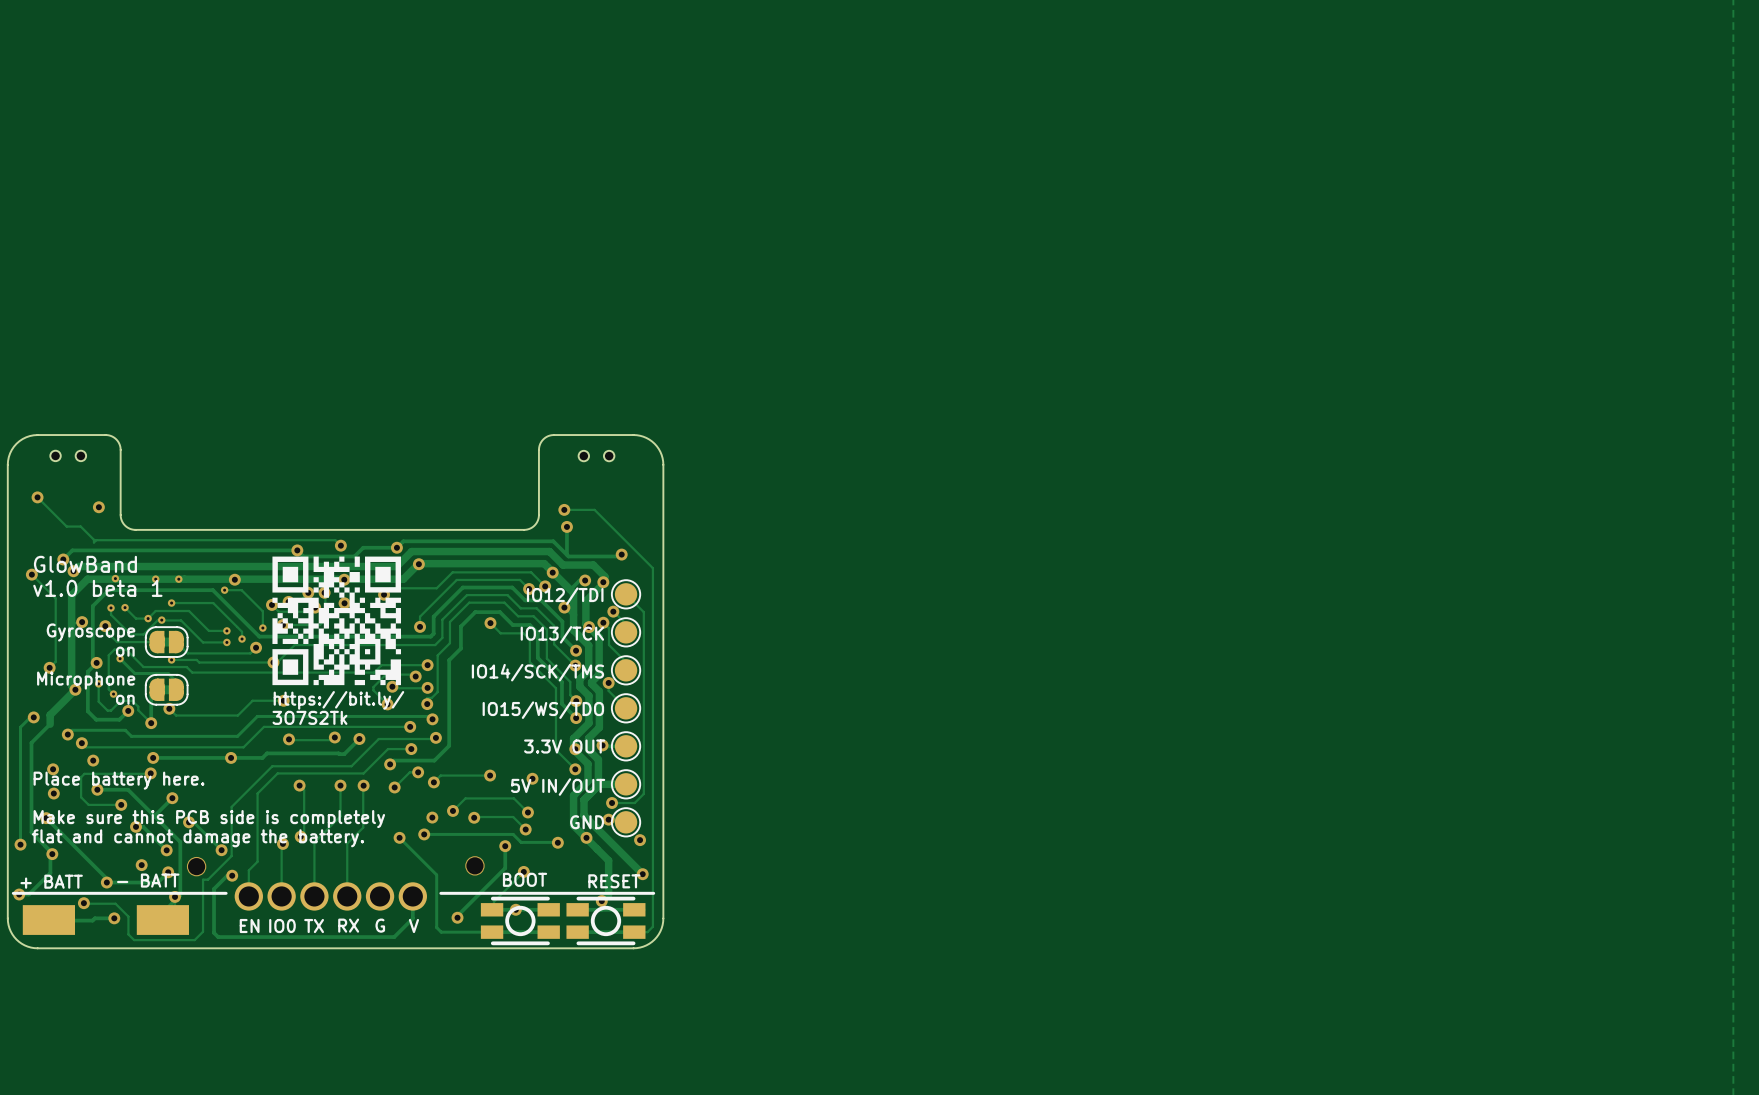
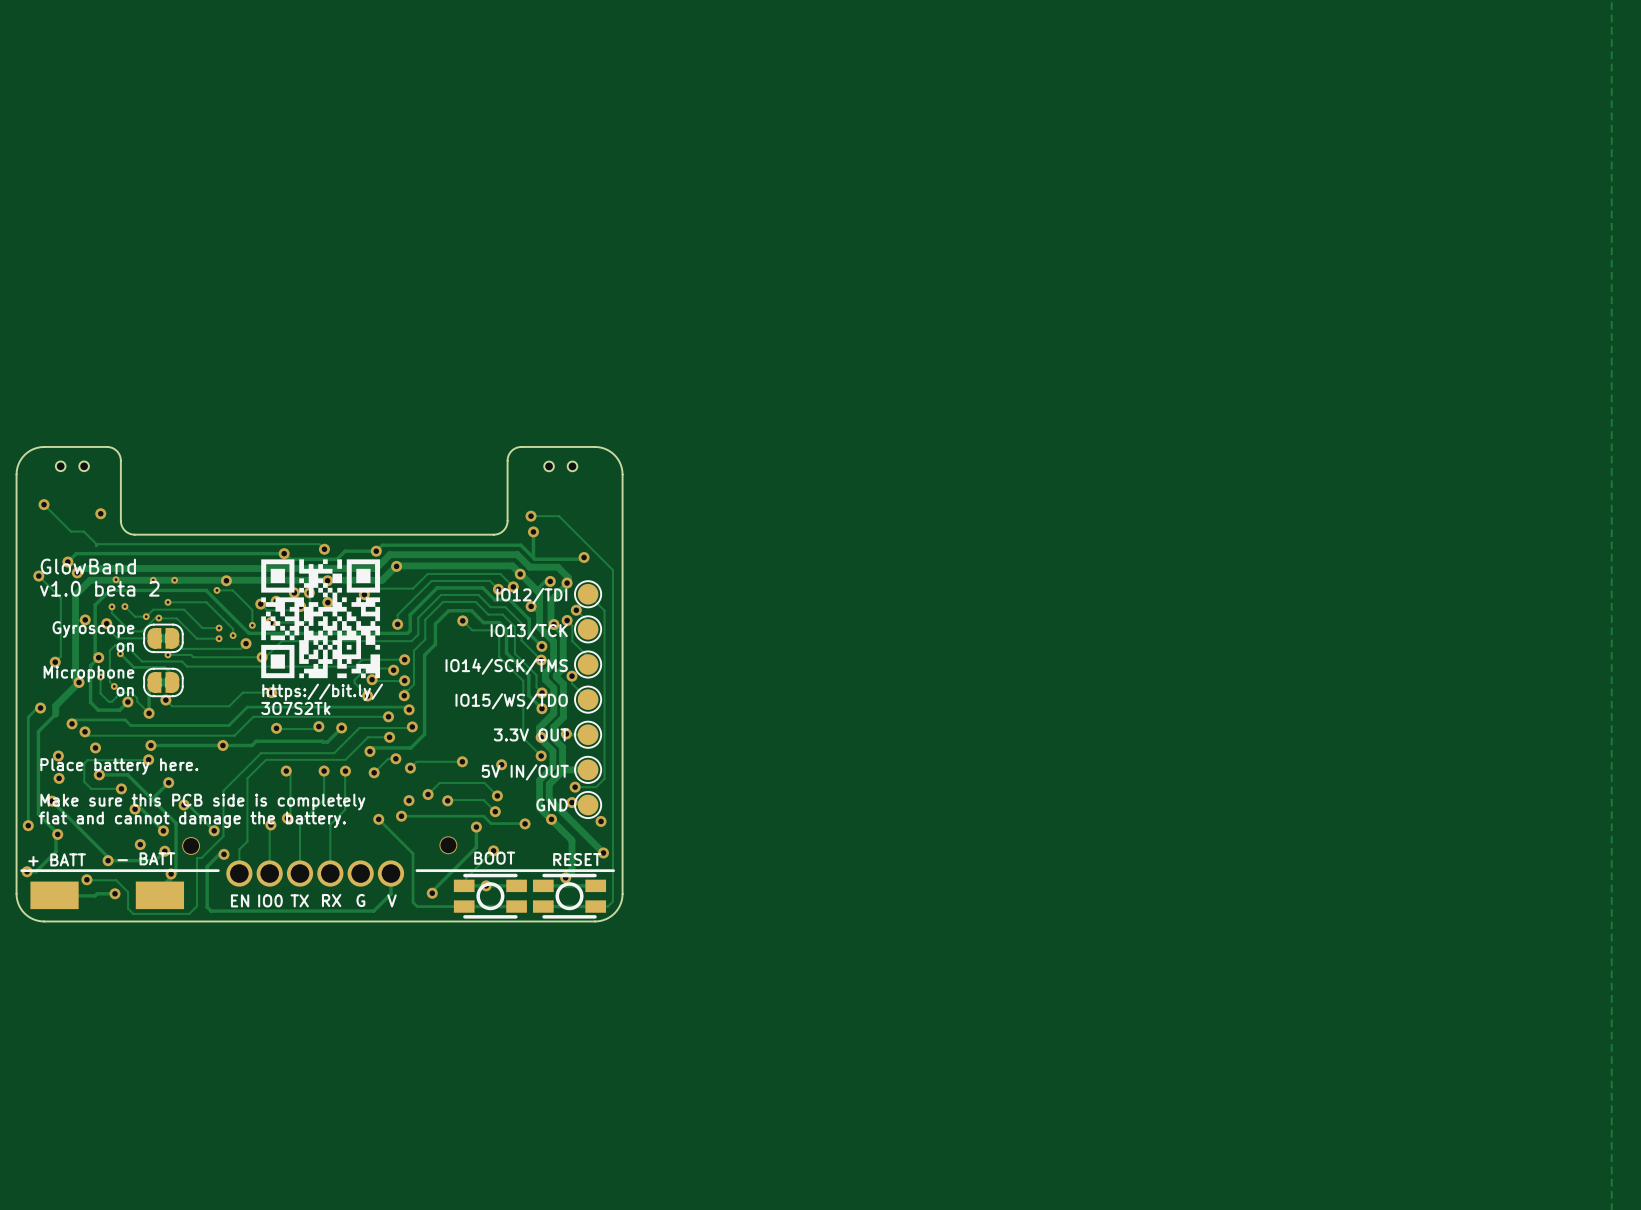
text: v1.0 beta 1 (97, 588) -> v1.0 beta 2 (99, 588)

